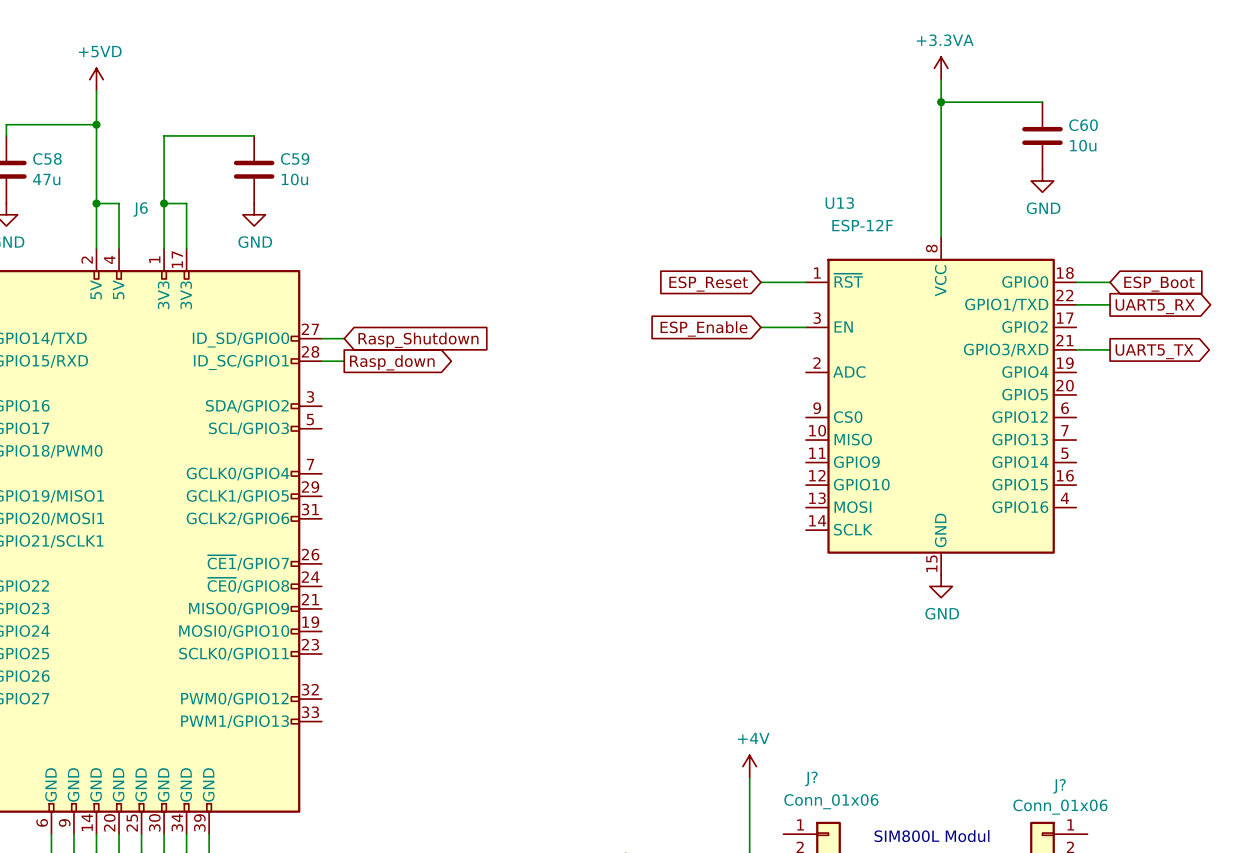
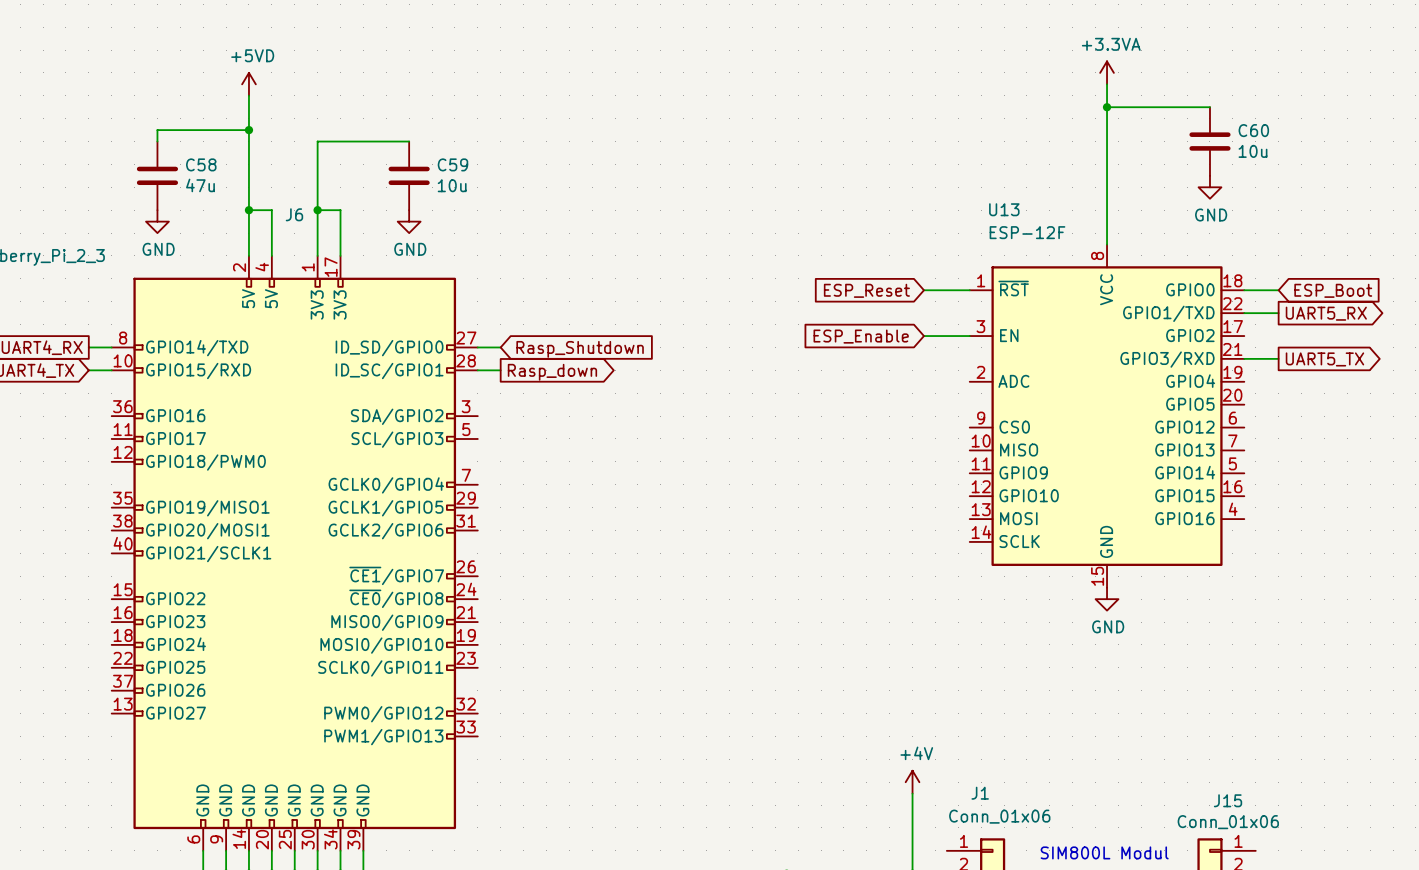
J? name: J? (811, 778) -> J1 (980, 793)
J? name: J? (1059, 786) -> J15 (1228, 800)

